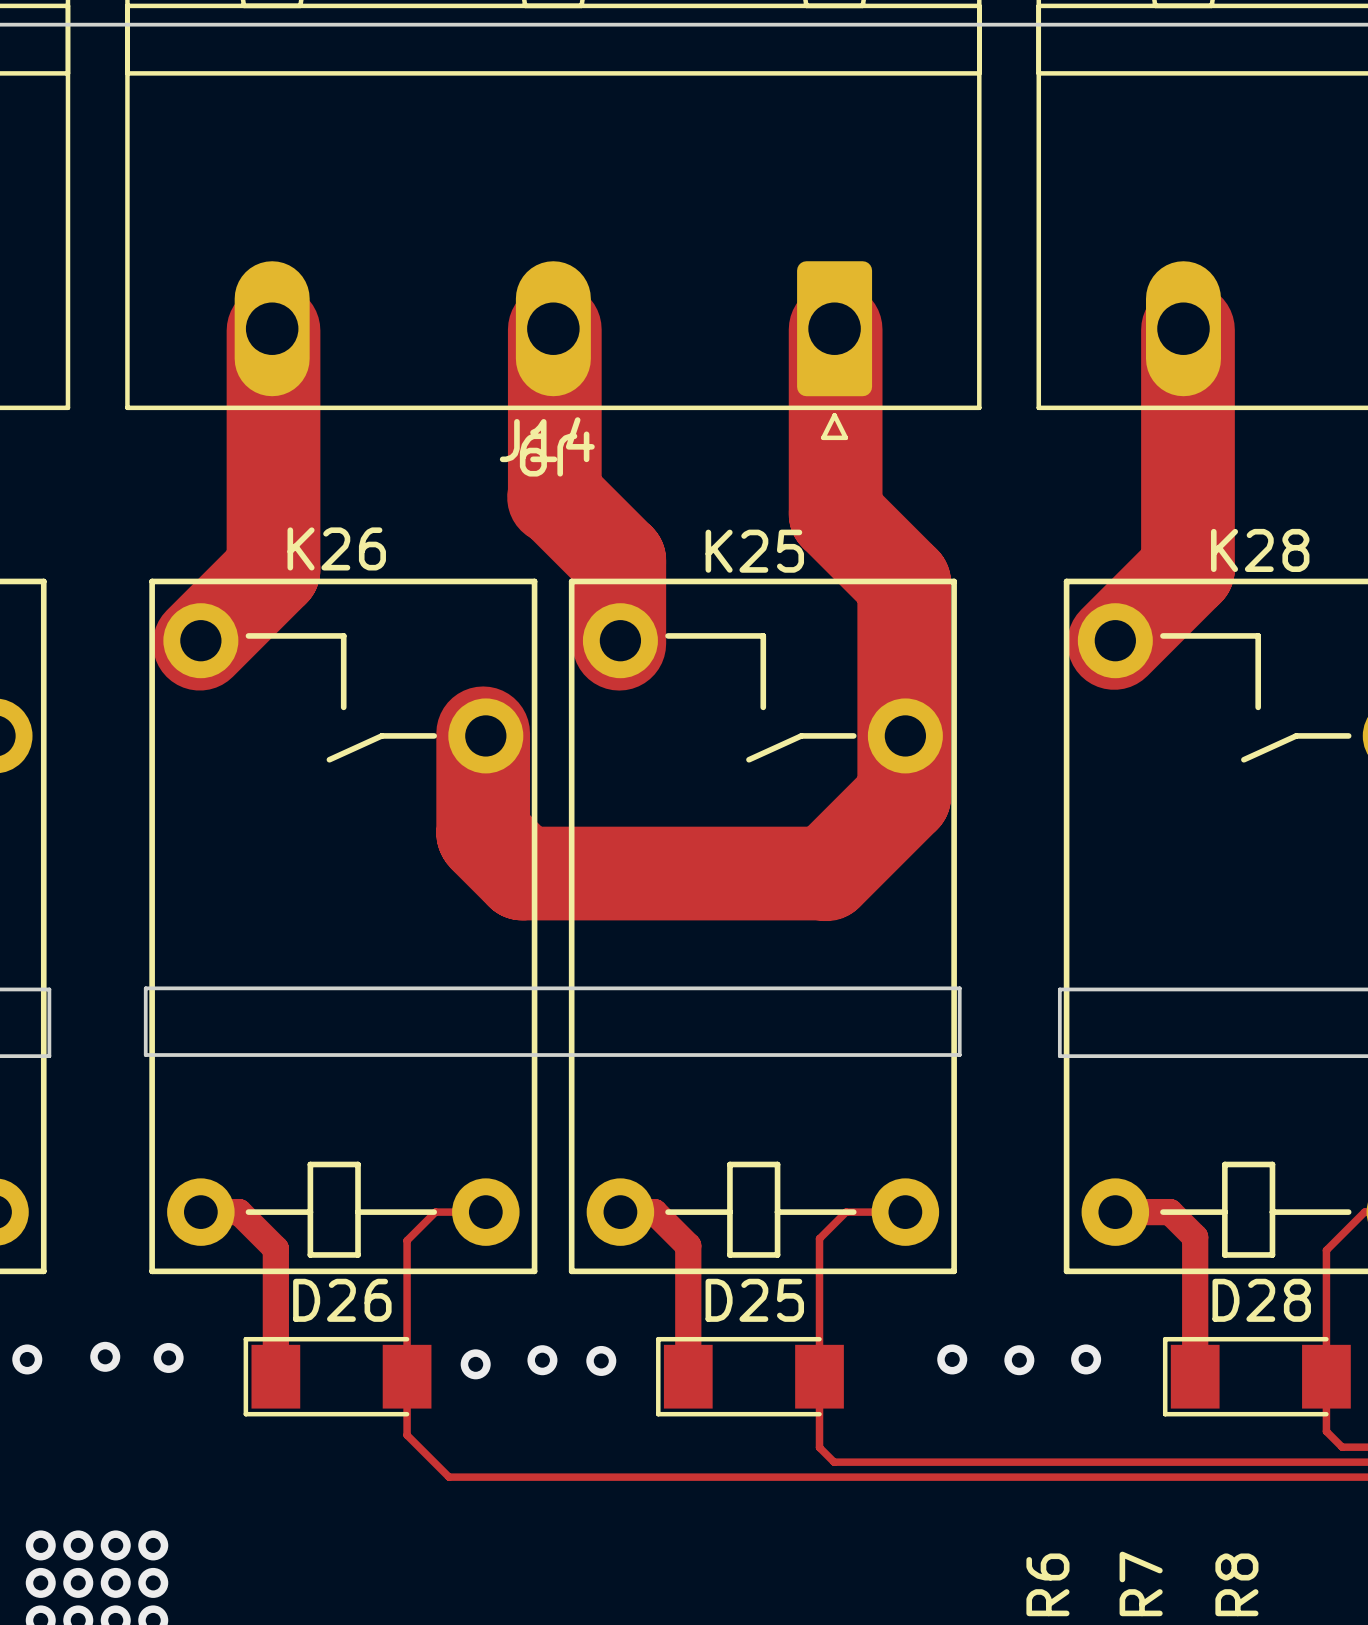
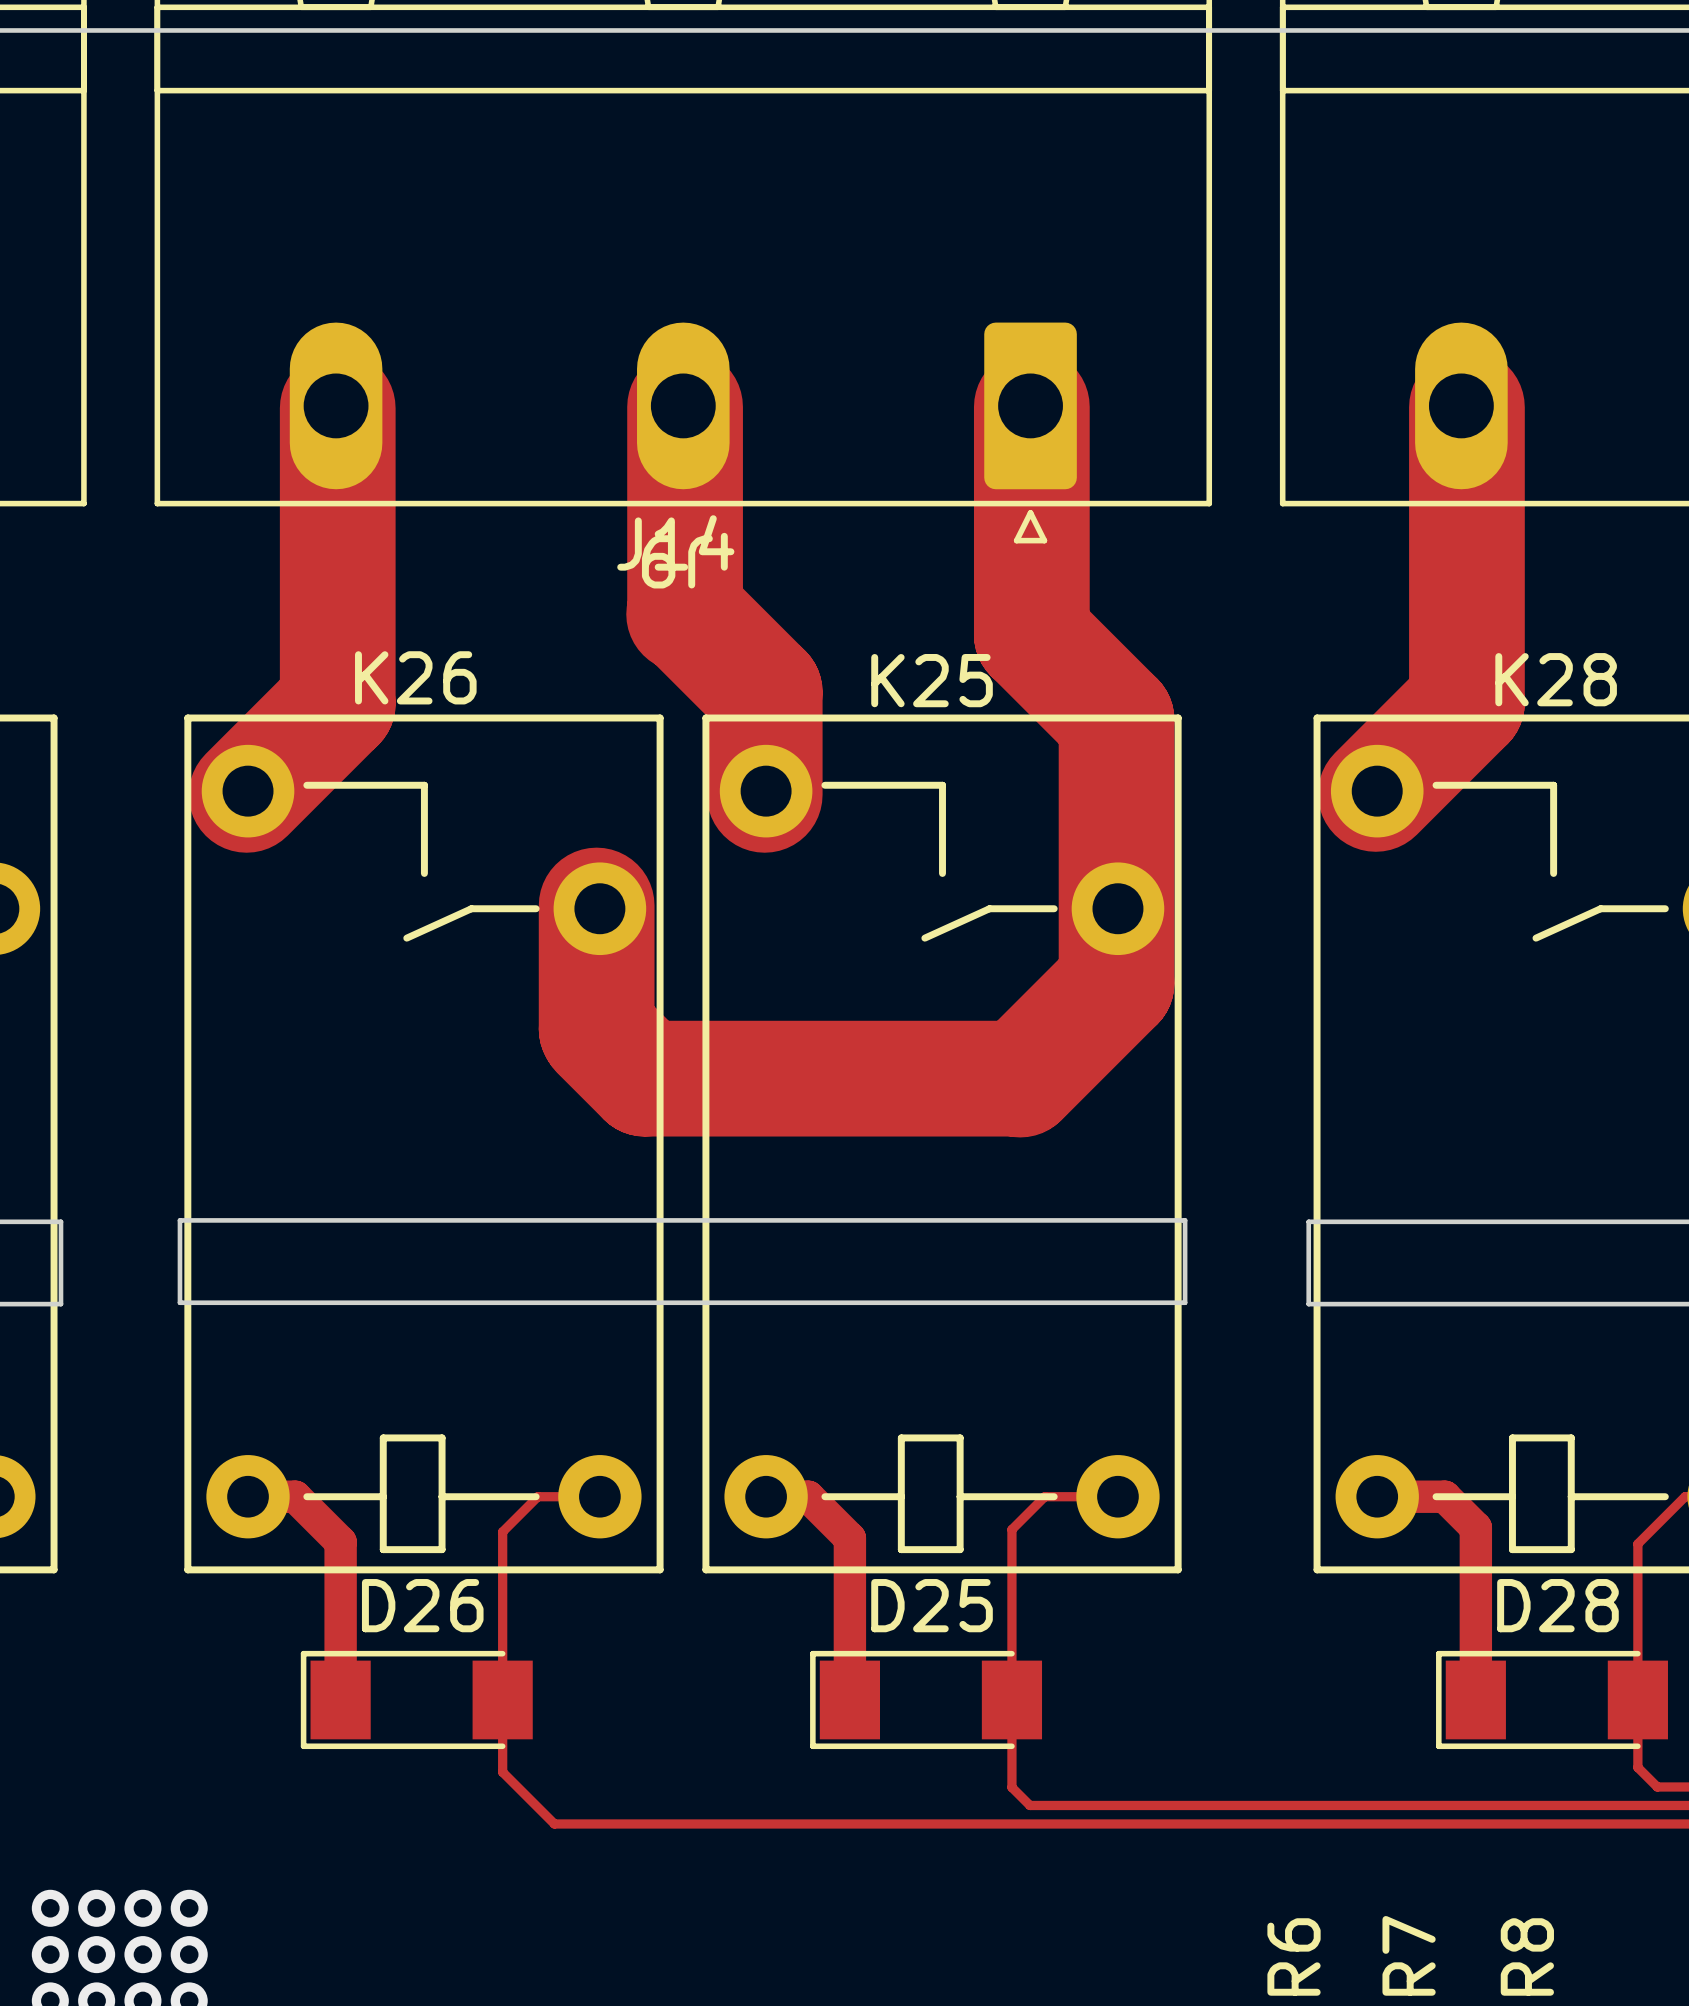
via: (105, 1356) -> none
via: (168, 1357) -> none
via: (27, 1359) -> none
via: (952, 1359) -> none
via: (1086, 1359) -> none
via: (542, 1360) -> none
via: (601, 1360) -> none
via: (1019, 1360) -> none
via: (475, 1364) -> none

